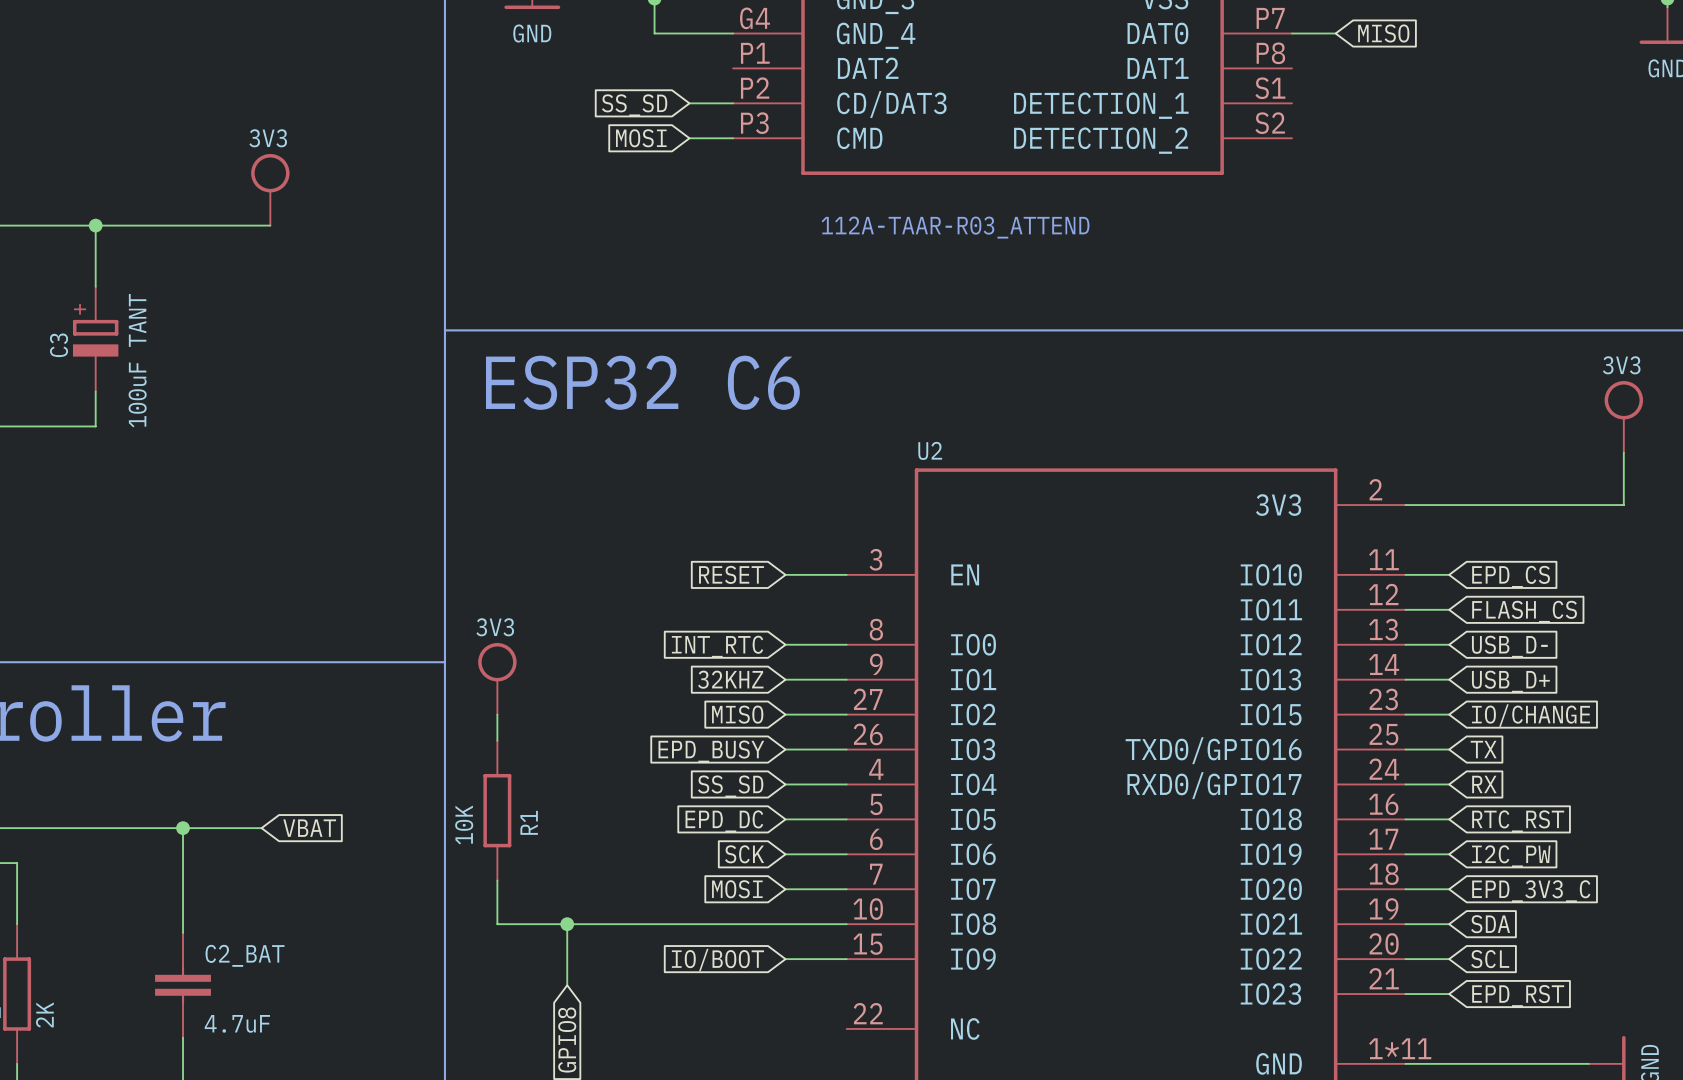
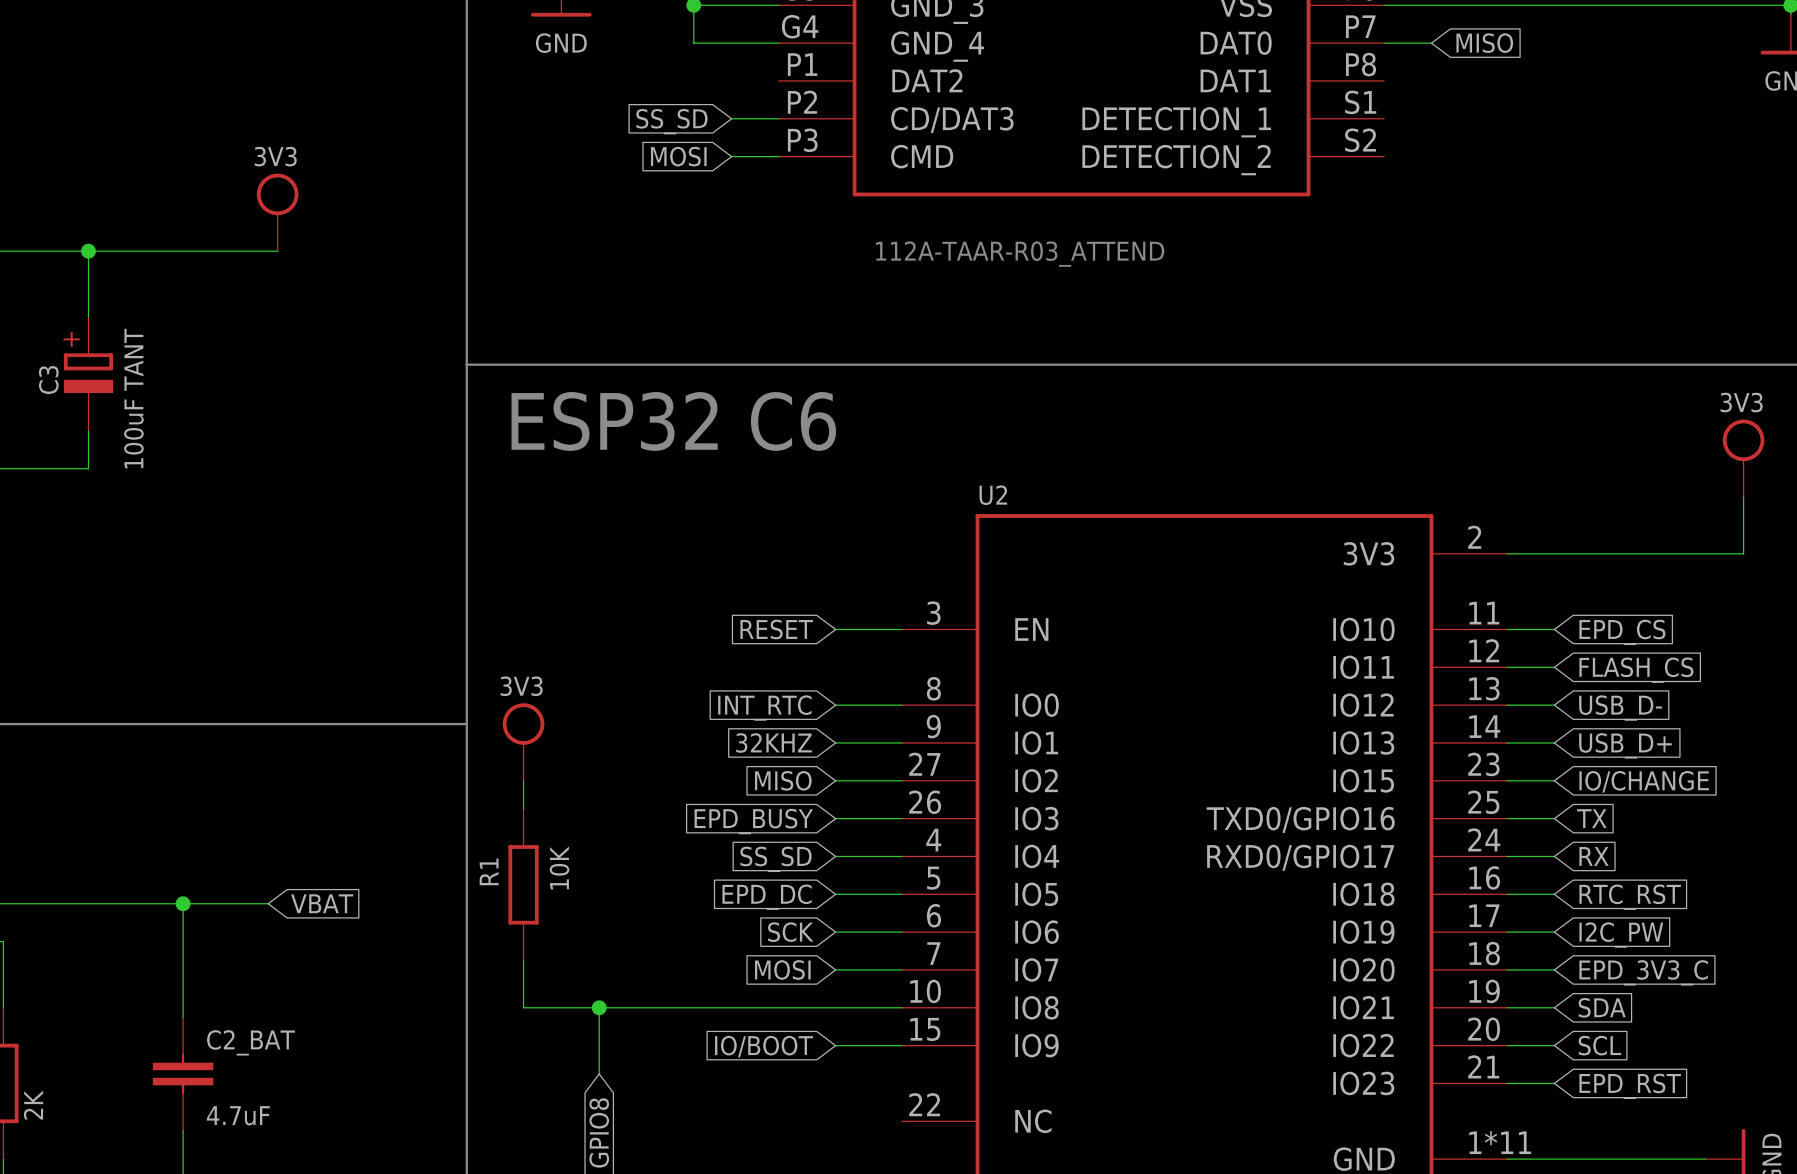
R1 name position: R1 (529, 822) -> R1 (489, 871)
R1 value position: 10K (464, 824) -> 10K (559, 868)

